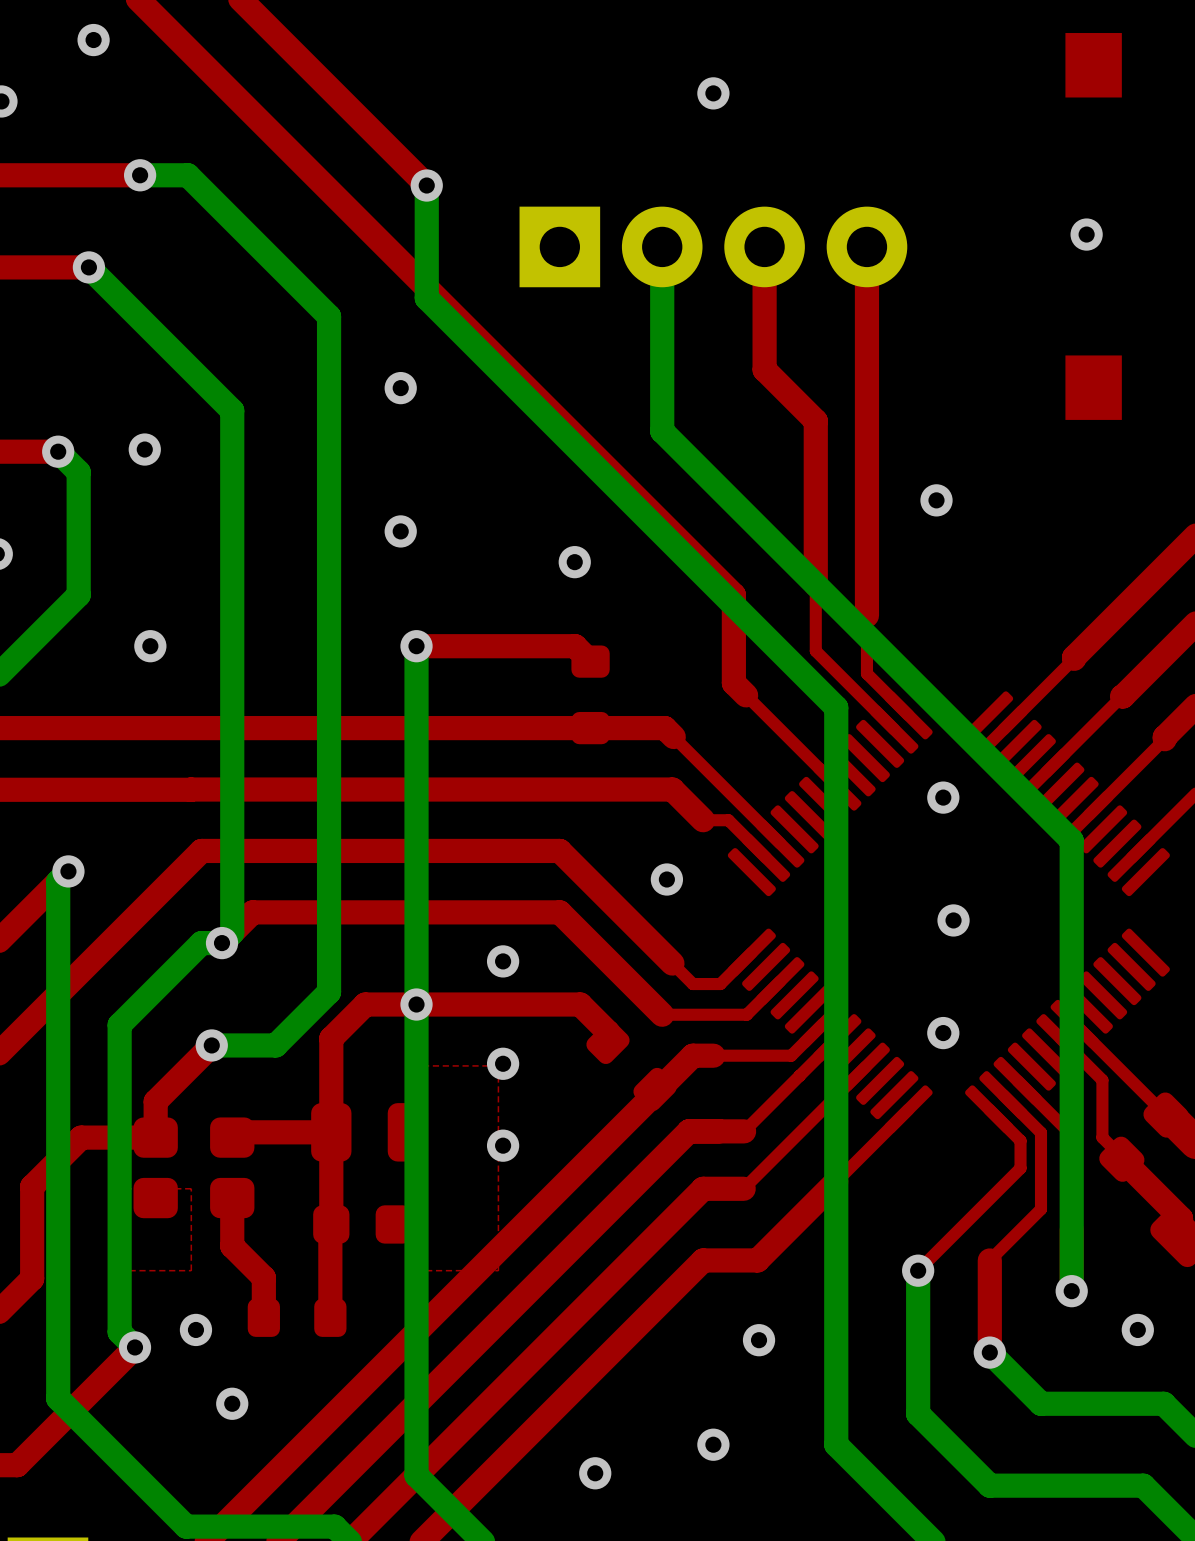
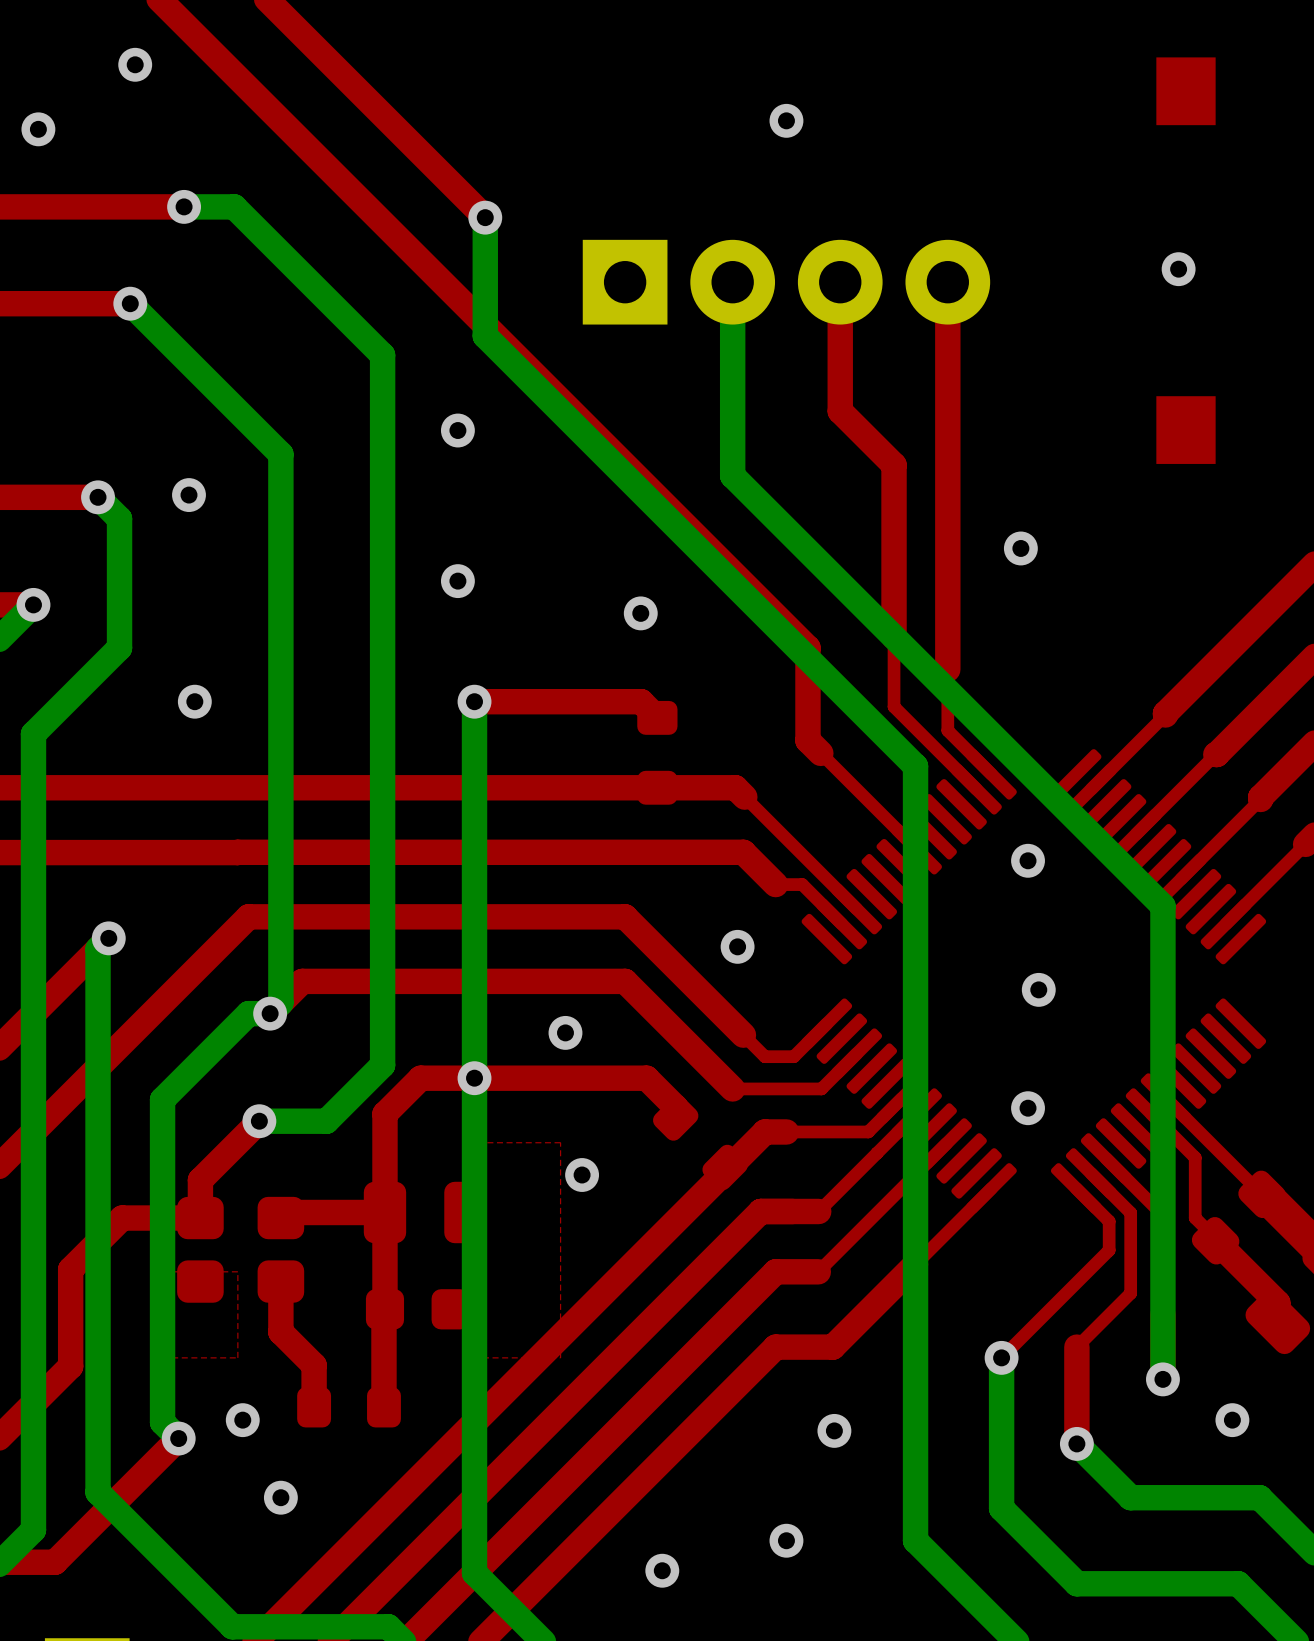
via: (503, 1063) -> none
via: none -> (582, 1175)
via: (503, 1145) -> none

